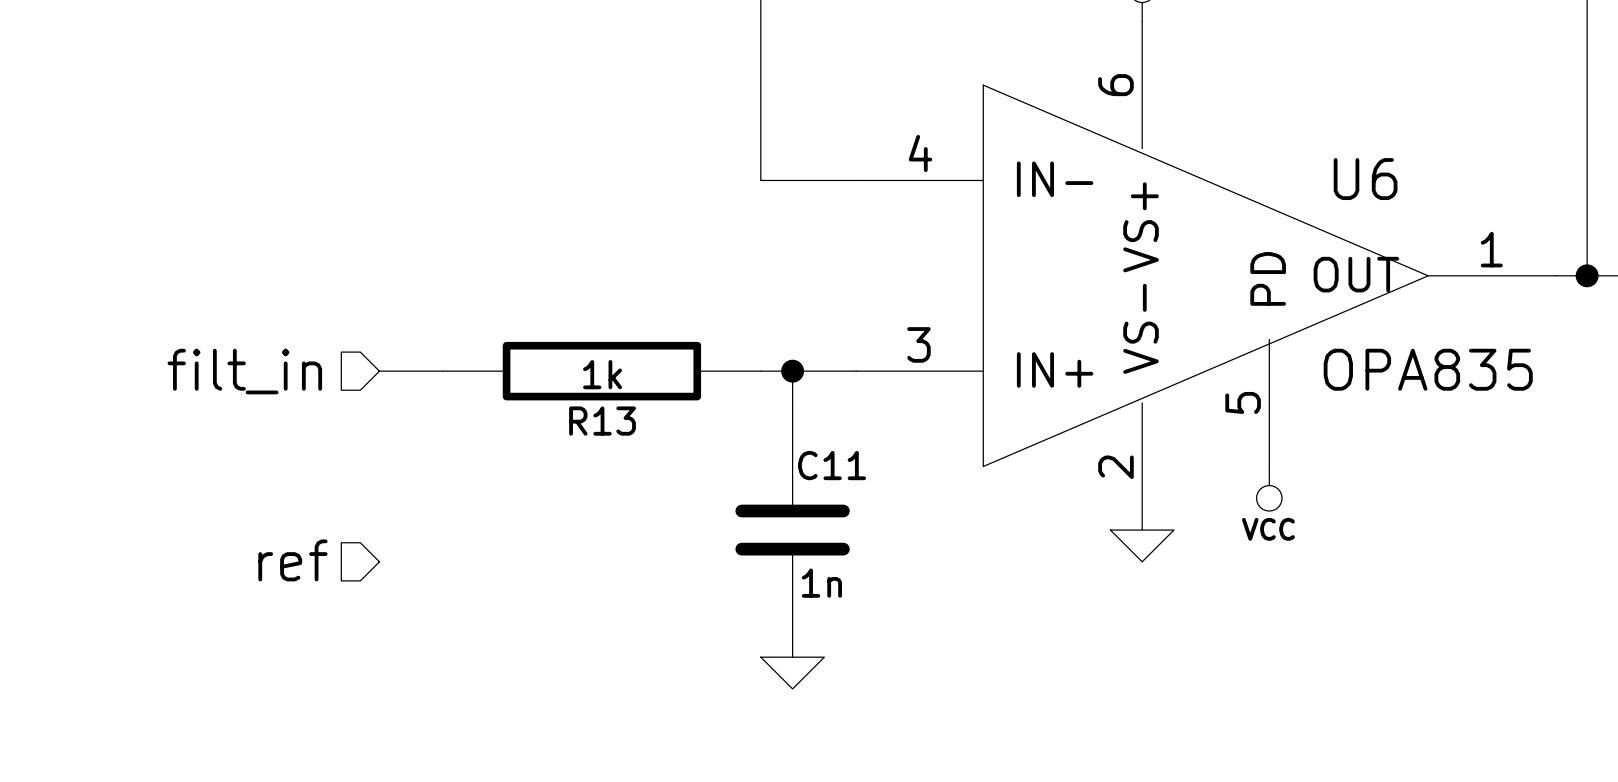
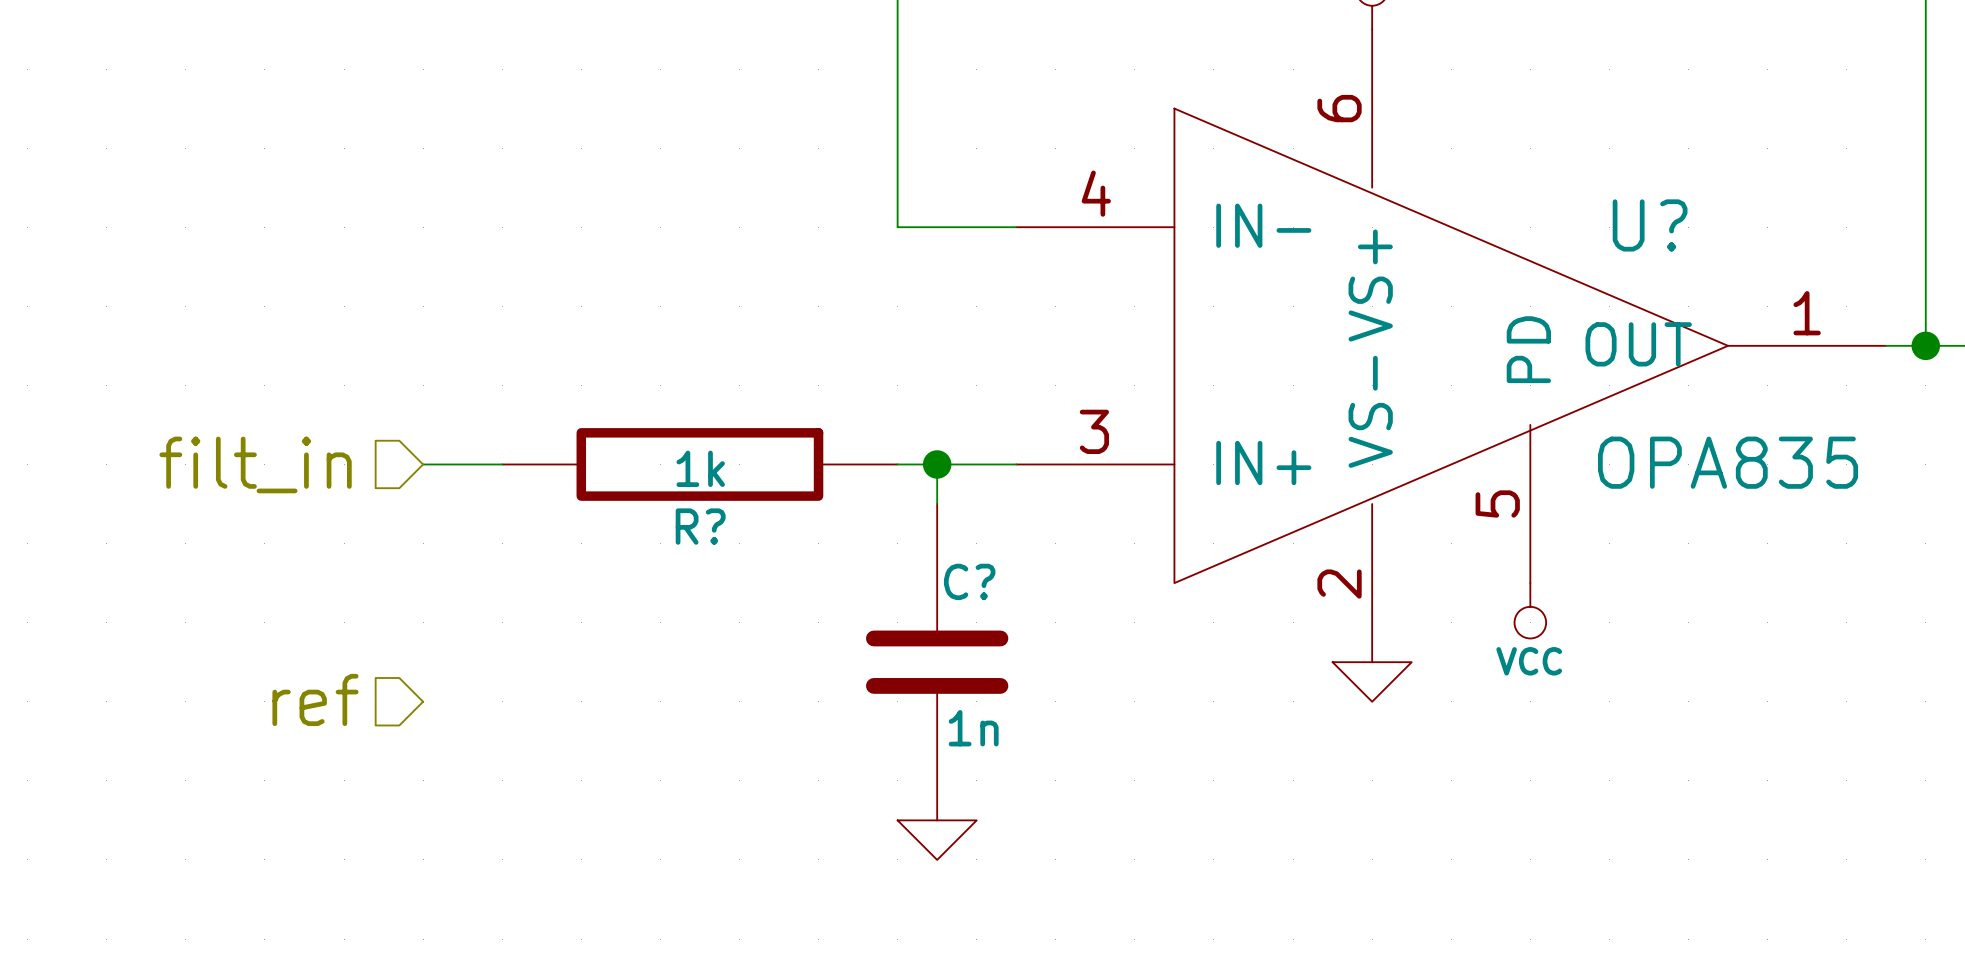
U6 name: U6 (1365, 179) -> U? (1650, 225)
R13 name: R13 (602, 421) -> R? (700, 526)
C11 name: C11 (832, 465) -> C? (969, 581)

